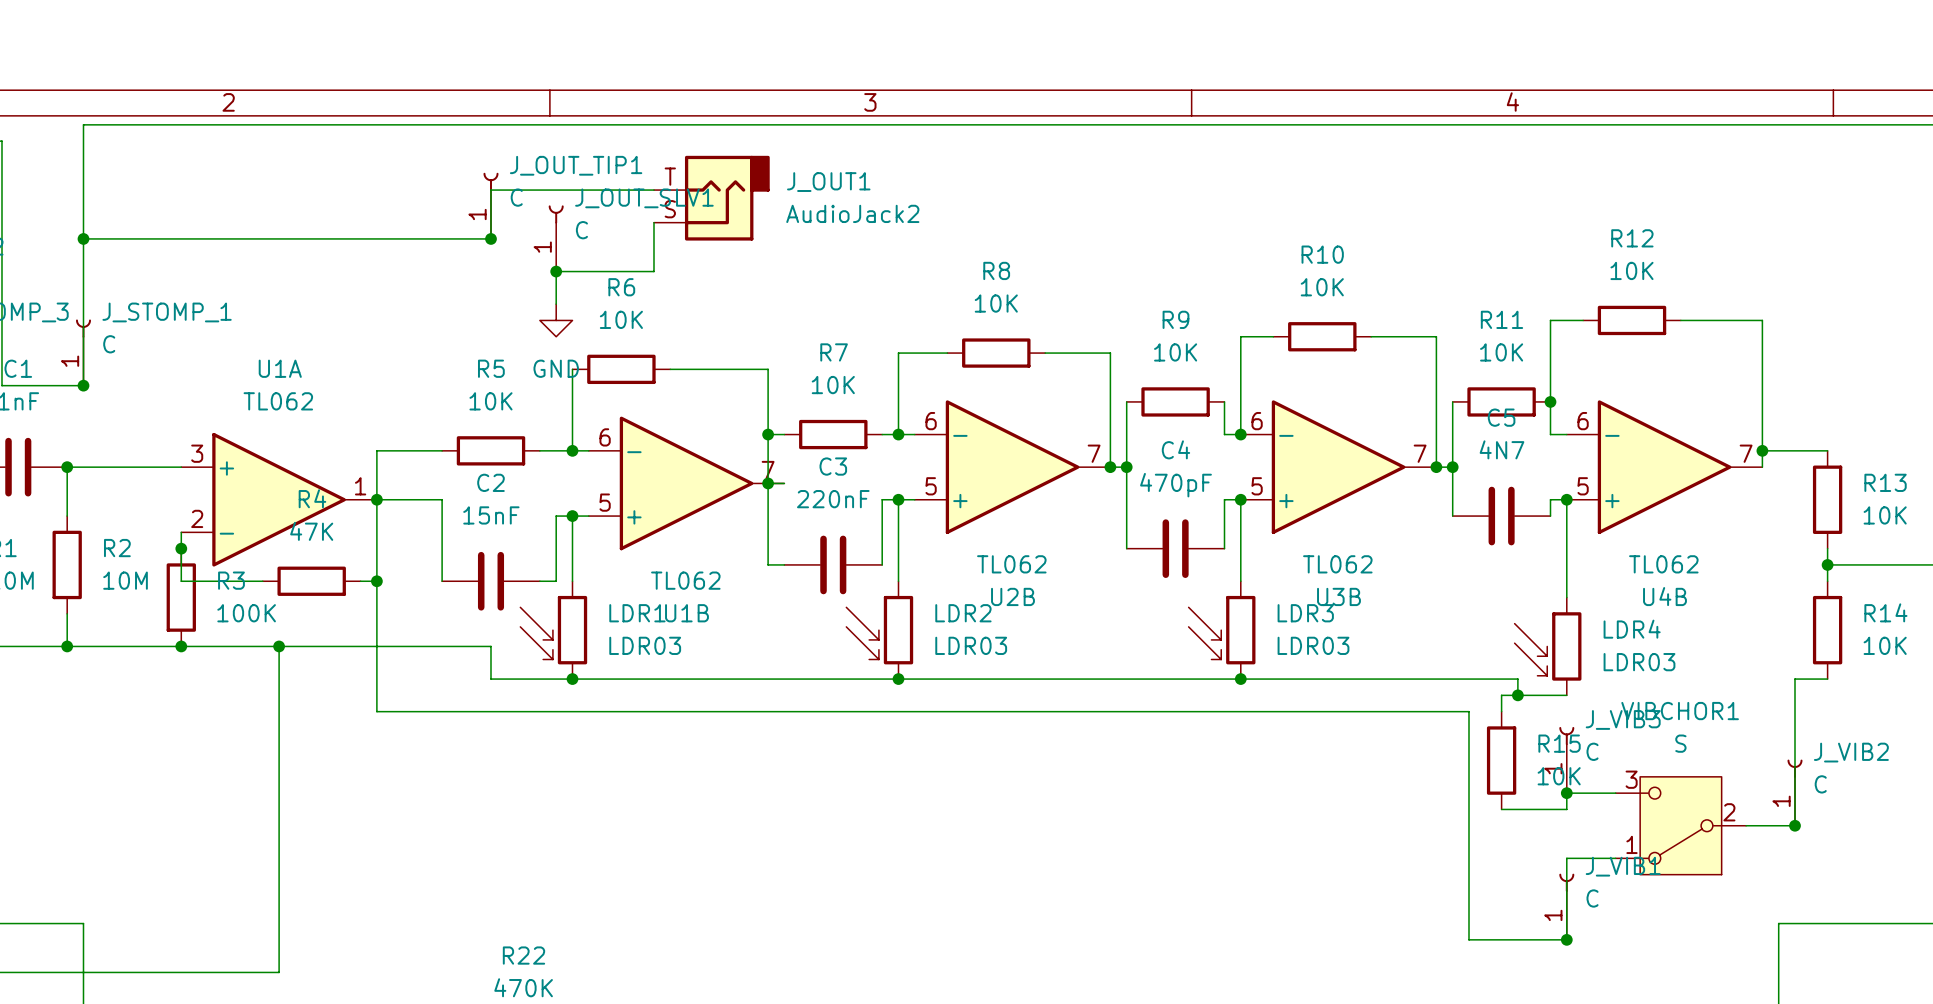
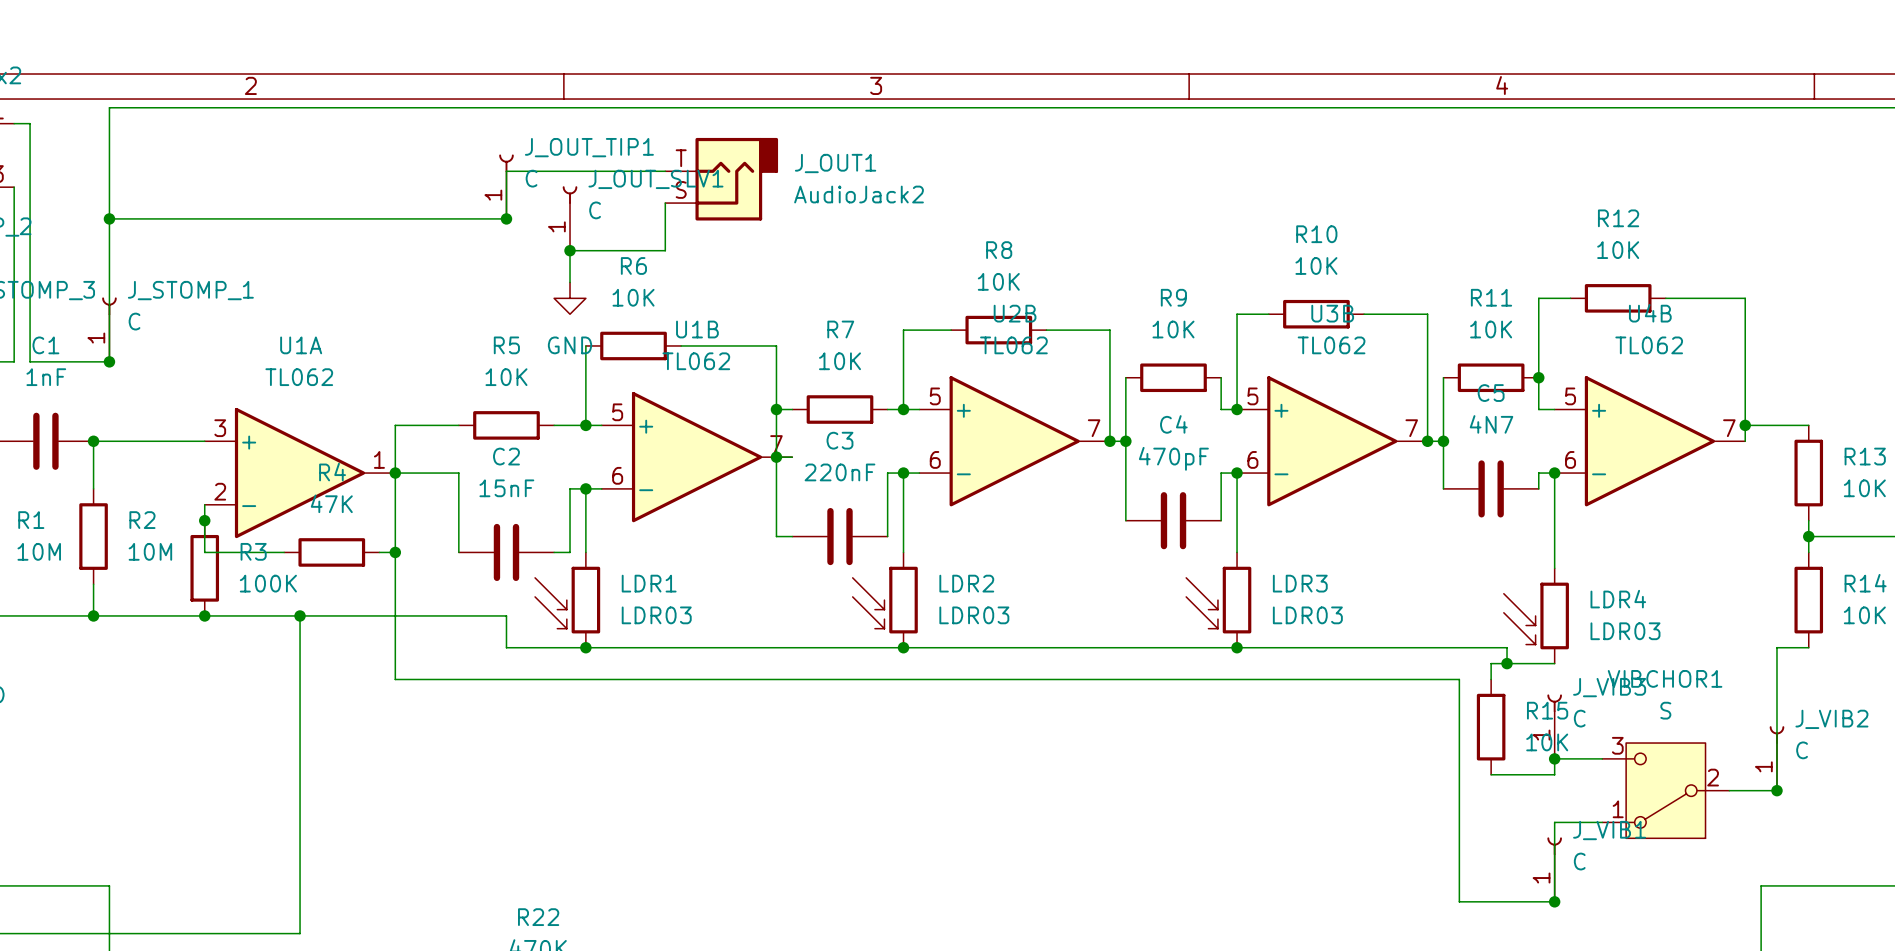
U2B flip: as is (1012, 467) -> up-down (1014, 441)
U3B flip: as is (1338, 467) -> up-down (1332, 441)
U4B flip: as is (1664, 467) -> up-down (1649, 441)
U1B flip: as is (686, 483) -> up-down (697, 457)

